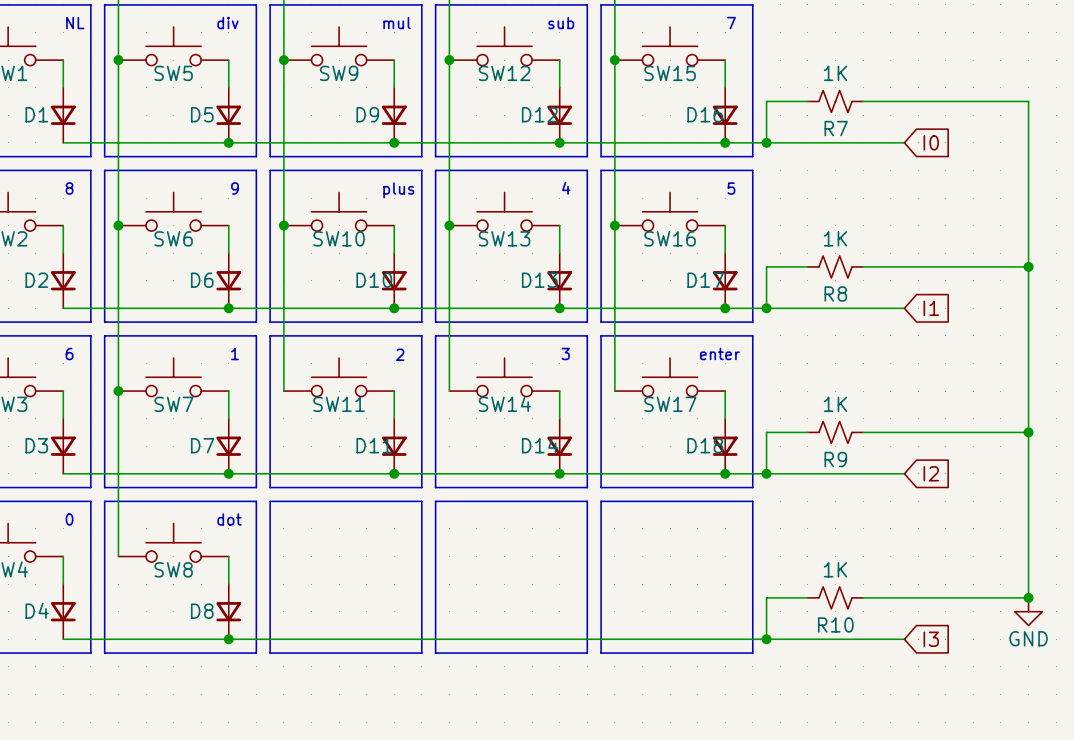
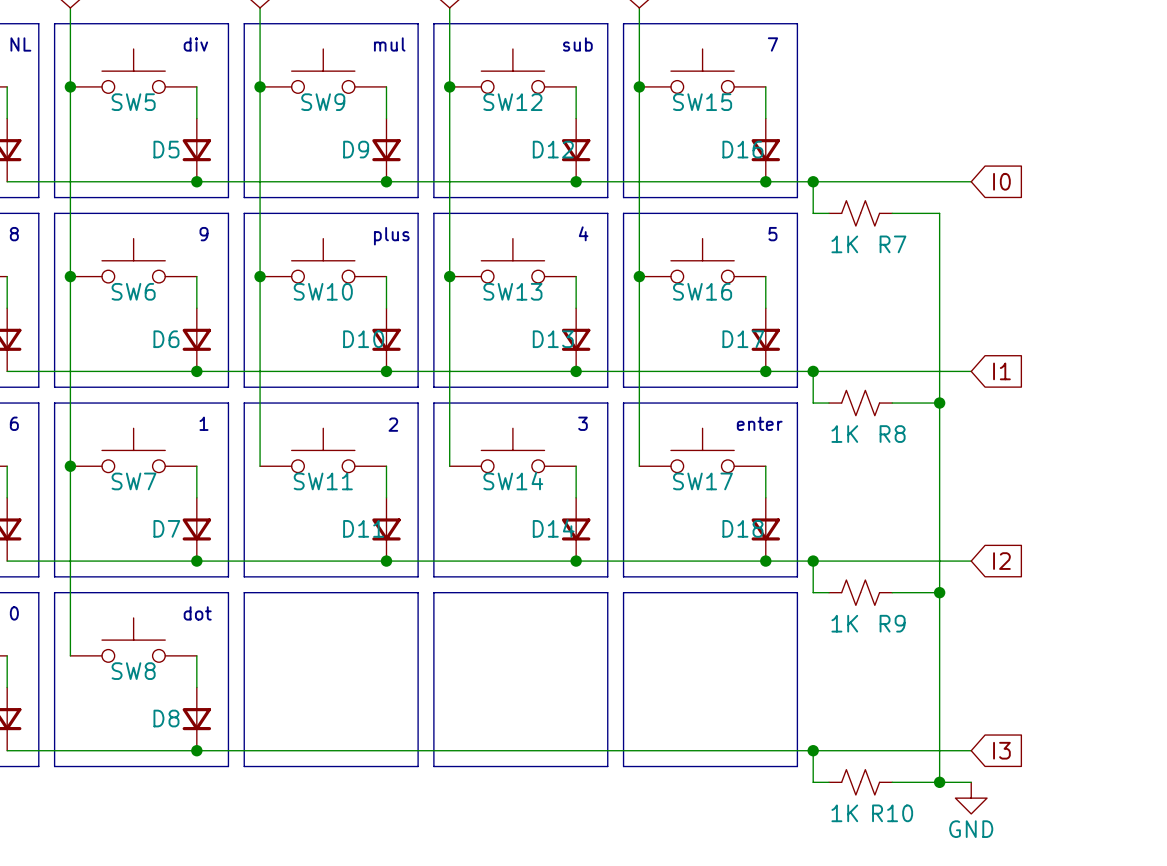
R7 value position: 1K (835, 73) -> 1K (844, 244)
wire: (807, 101) (766, 101) (766, 142) -> (829, 213) (813, 213) (813, 181)
R7 position: (835, 101) -> (860, 213)
wire: (863, 101) (1028, 101) (1028, 597) (863, 597) -> none
R7 name position: R7 (836, 128) -> R7 (892, 244)
wire: none -> (892, 213) (939, 213) (939, 782)
R8 value position: 1K (835, 238) -> 1K (844, 434)
wire: (807, 266) (766, 266) (766, 308) -> (829, 403) (813, 403) (813, 371)
R8 position: (835, 266) -> (860, 403)
wire: (863, 266) (1028, 266) -> none
junction: (1028, 266) -> none
R8 name position: R8 (835, 294) -> R8 (892, 434)
wire: none -> (892, 403) (939, 403)
junction: none -> (939, 403)
R9 value position: 1K (835, 404) -> 1K (844, 623)
wire: (807, 432) (766, 432) (766, 473) -> (829, 592) (813, 592) (813, 561)
R9 position: (835, 432) -> (860, 592)
wire: (863, 432) (1028, 432) -> none
junction: (1028, 432) -> none
R9 name position: R9 (835, 459) -> R9 (892, 623)
wire: none -> (892, 592) (939, 592)
junction: none -> (939, 592)
R10 value position: 1K (835, 569) -> 1K (844, 813)
wire: (807, 597) (766, 597) (766, 639) -> (829, 782) (813, 782) (813, 750)
R10 position: (835, 597) -> (860, 782)
junction: (1028, 597) -> none
power symbol position: GND (1028, 611) -> GND (971, 798)
R10 name position: R10 (835, 624) -> R10 (892, 813)
wire: none -> (892, 782) (971, 782)
junction: none -> (939, 782)

